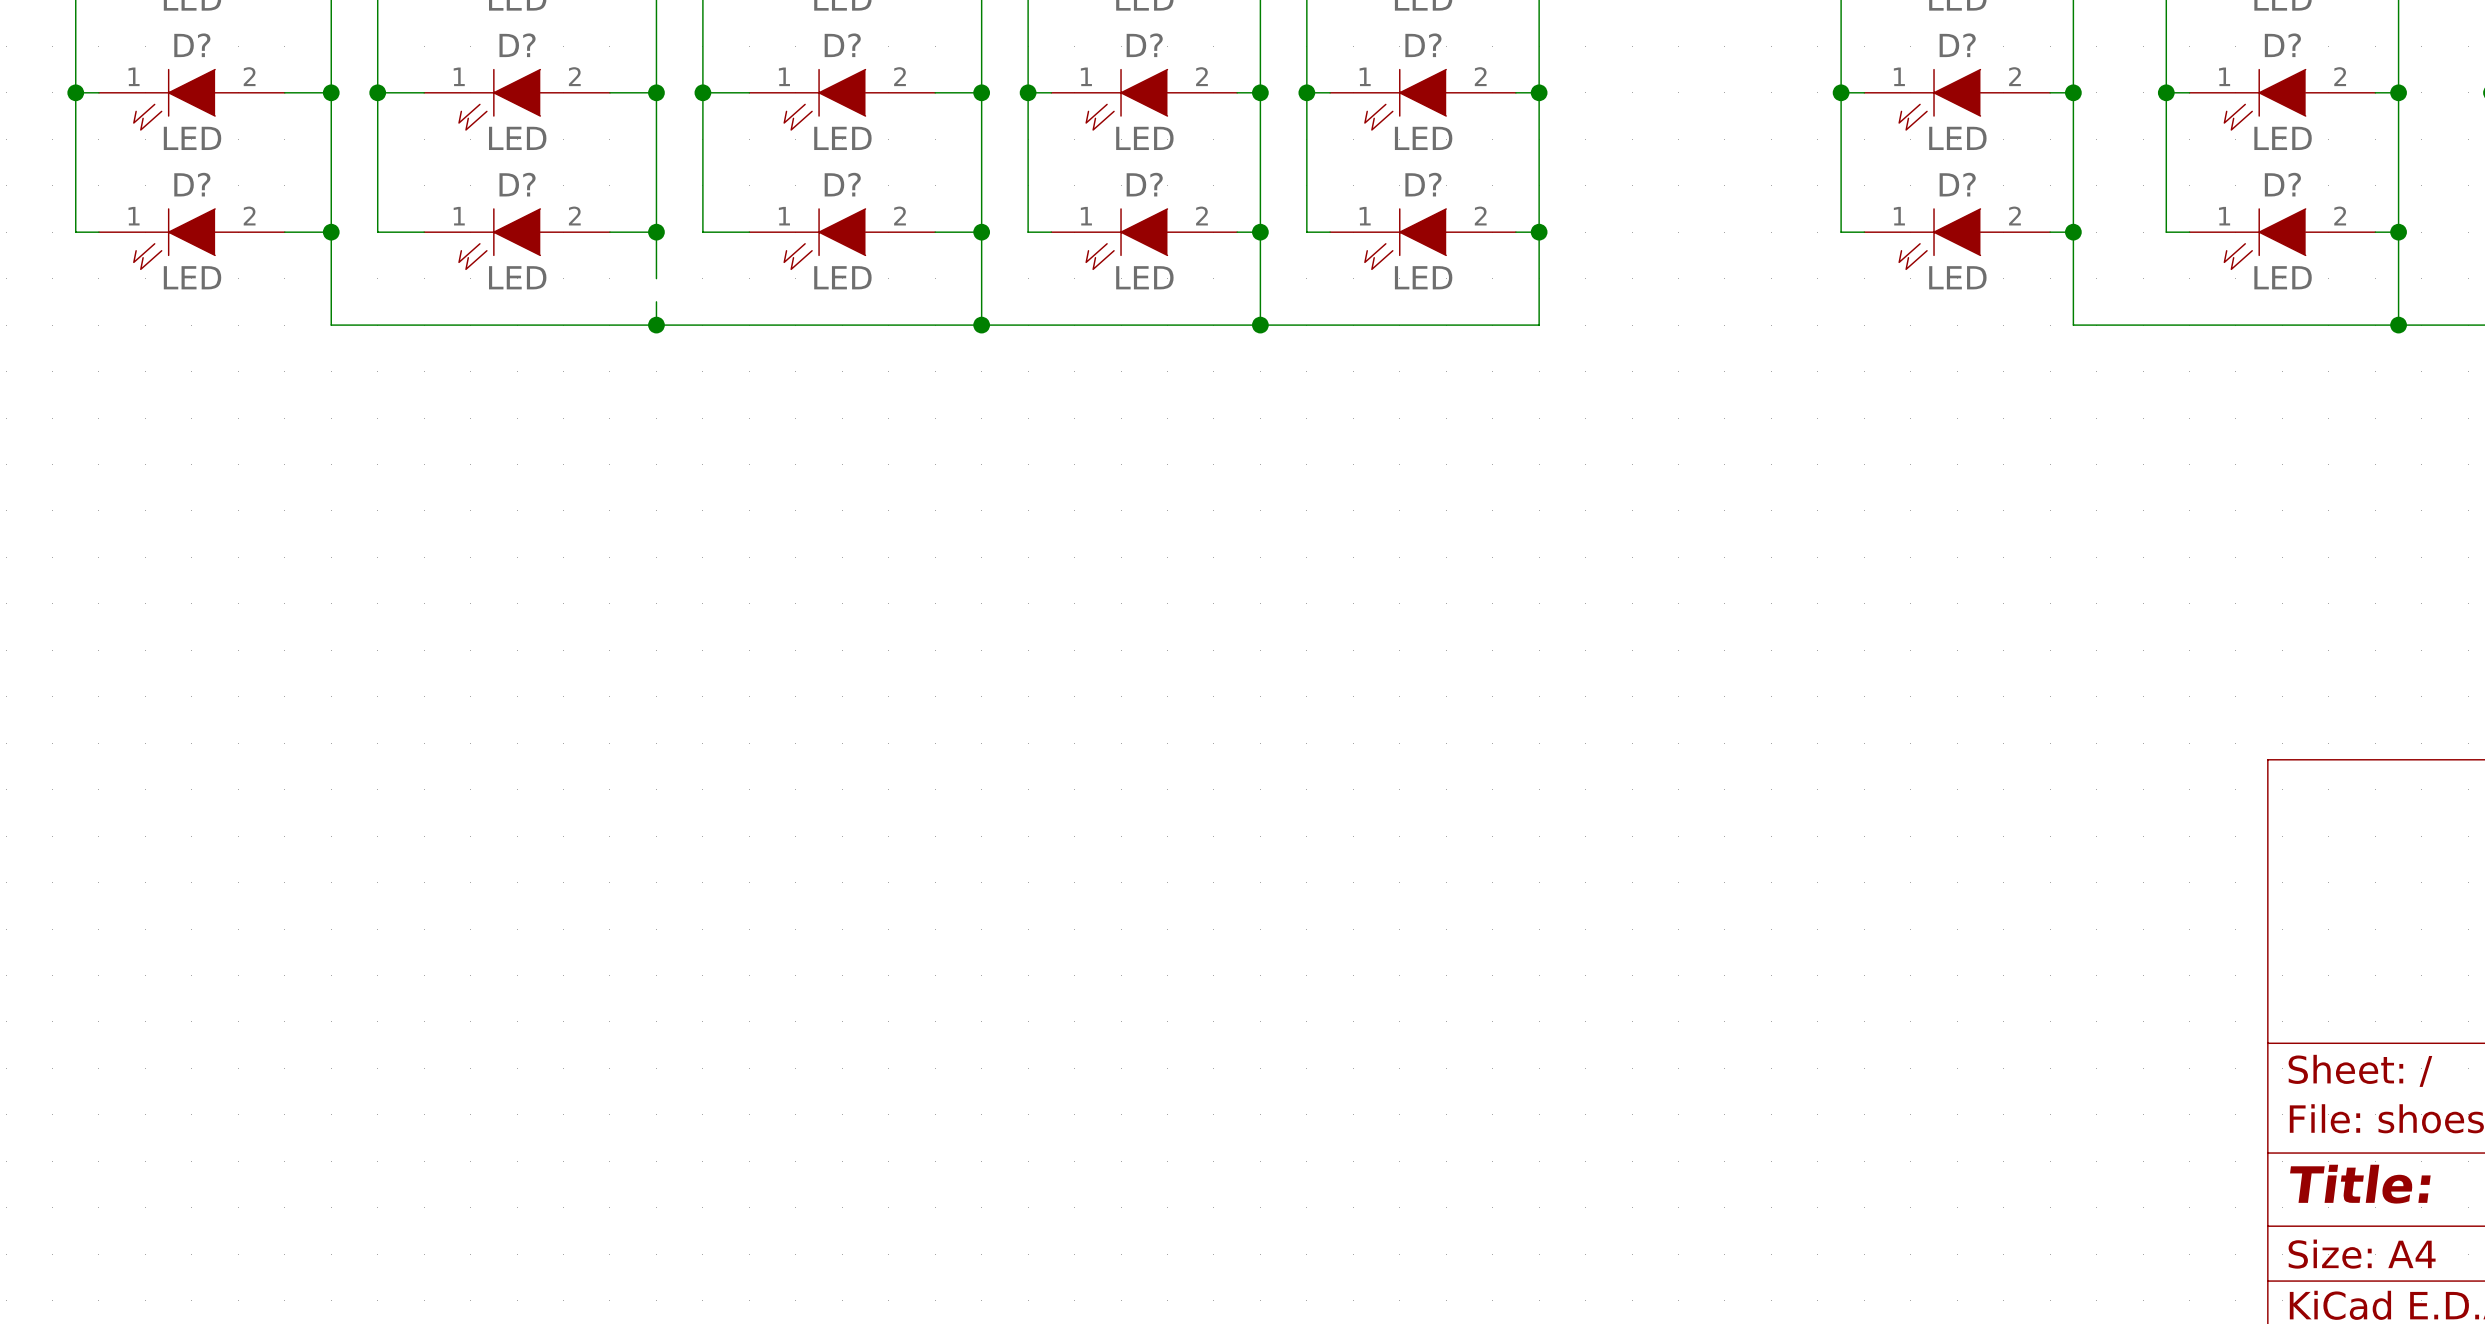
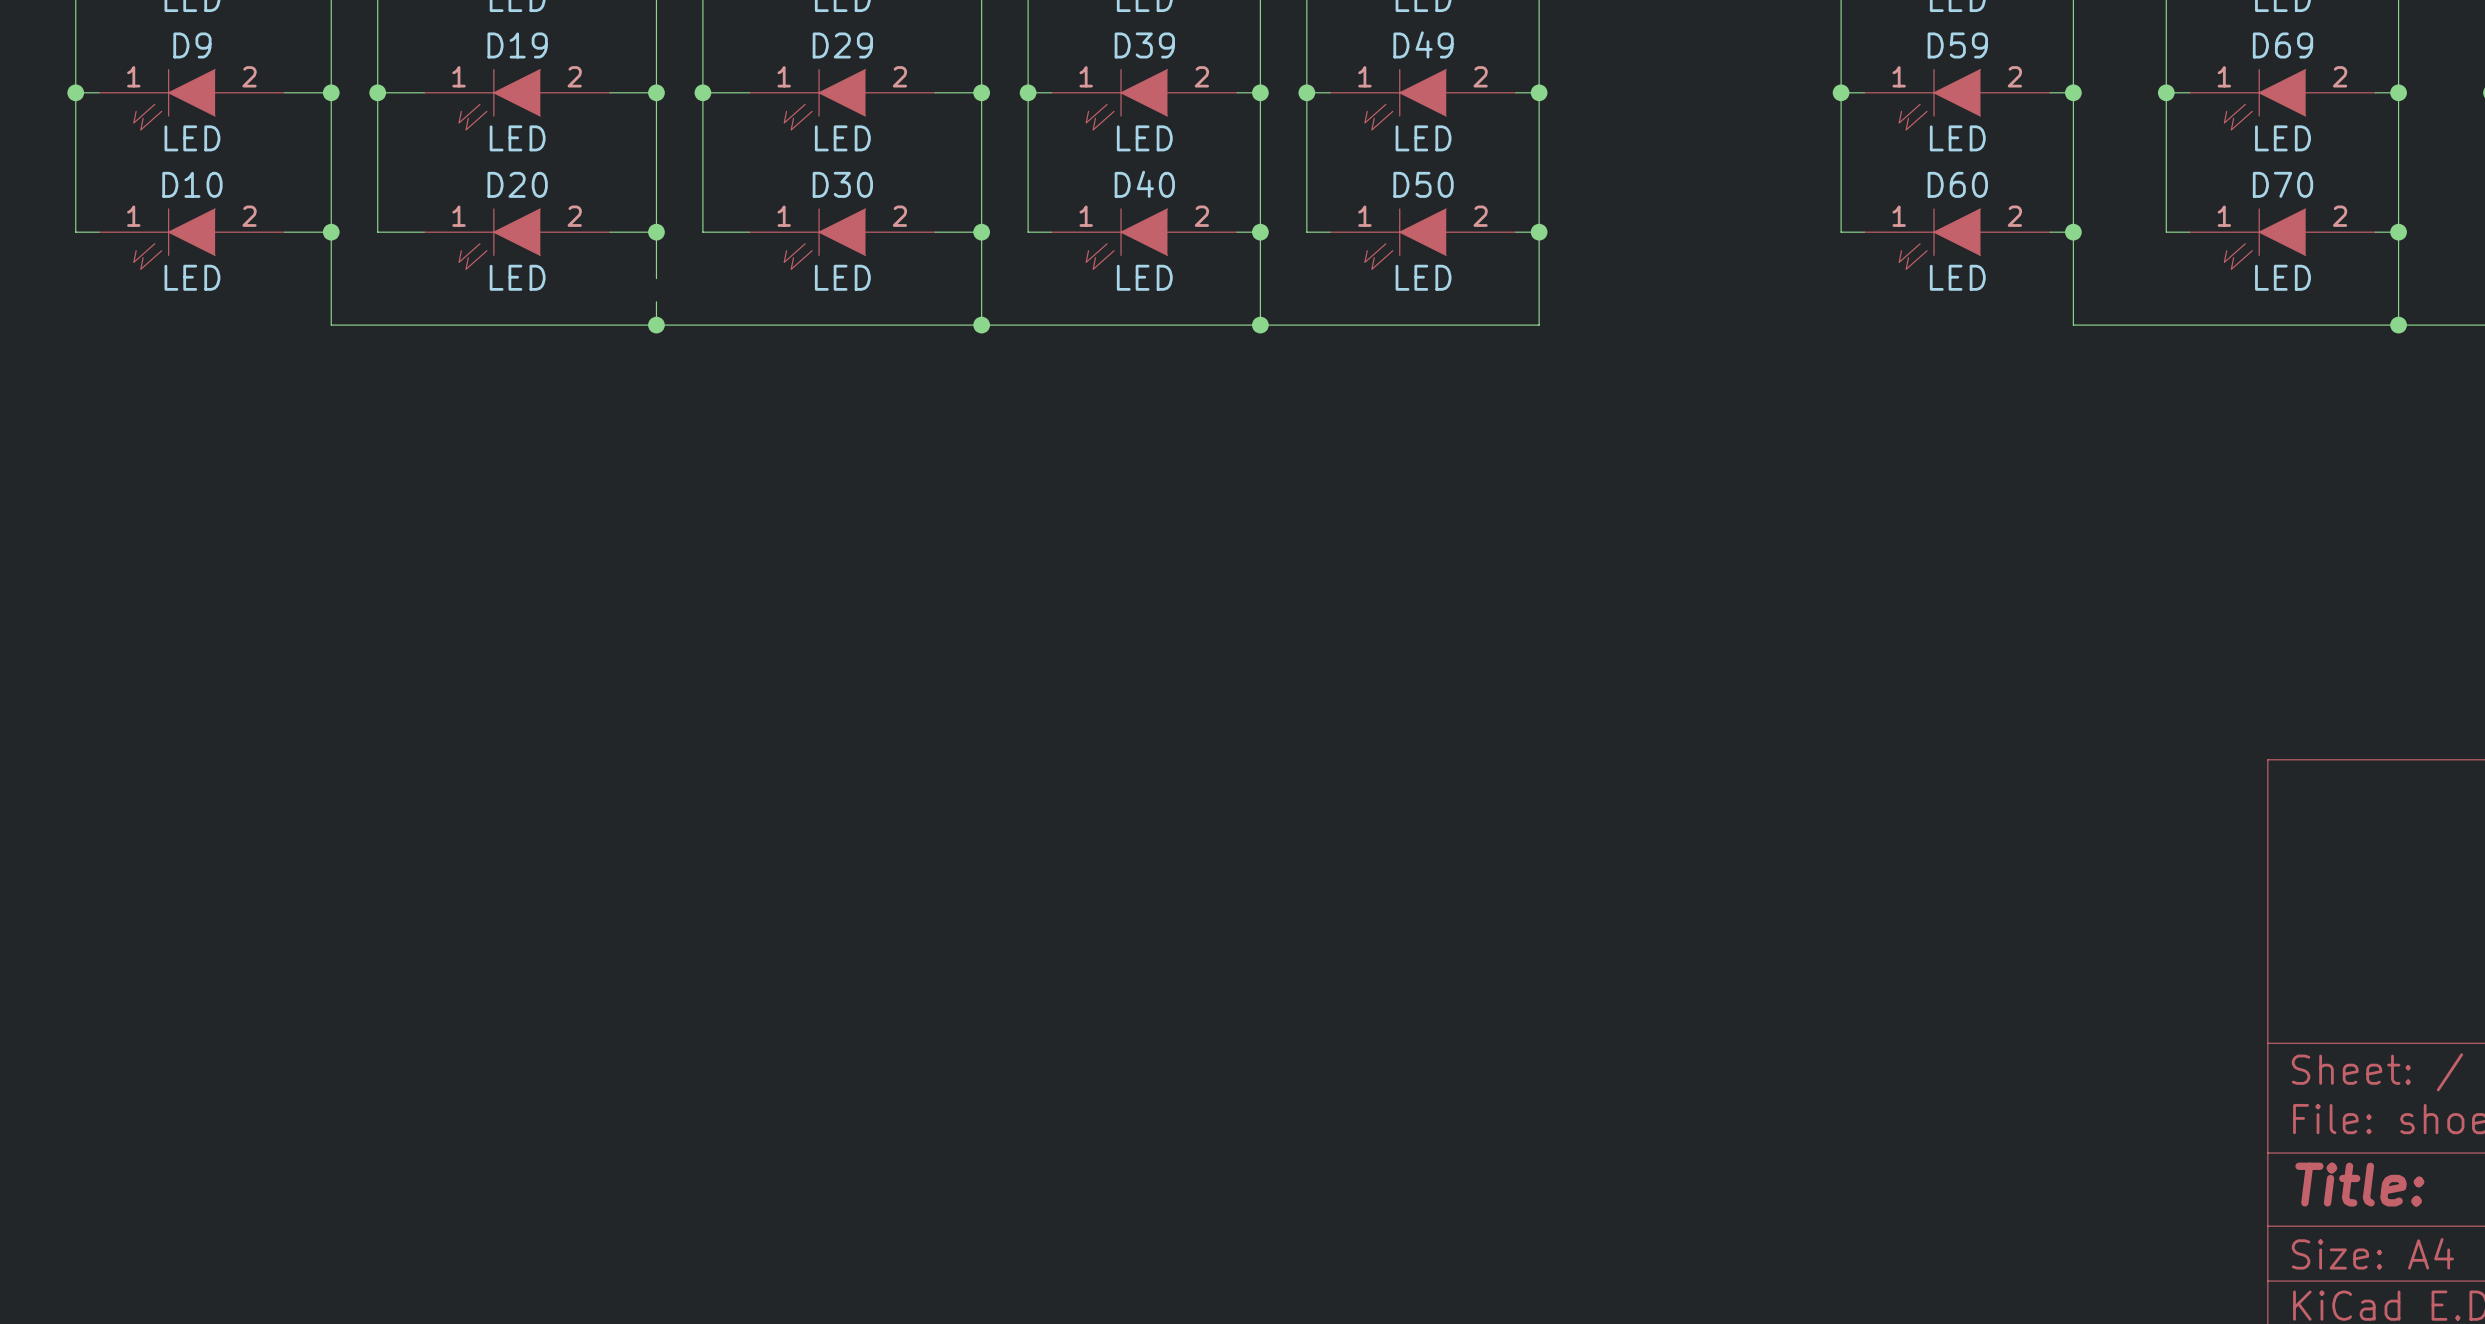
D? name: D? (192, 45) -> D9 (192, 45)
D? name: D? (517, 45) -> D19 (517, 45)
D? name: D? (842, 45) -> D29 (842, 45)
D? name: D? (1144, 45) -> D39 (1144, 45)
D? name: D? (1423, 45) -> D49 (1423, 44)
D? name: D? (1957, 45) -> D59 (1957, 45)
D? name: D? (2282, 45) -> D69 (2282, 45)
D? name: D? (192, 184) -> D10 (192, 184)
D? name: D? (517, 184) -> D20 (517, 184)
D? name: D? (842, 184) -> D30 (842, 184)
D? name: D? (1144, 184) -> D40 (1144, 184)
D? name: D? (1423, 184) -> D50 (1423, 184)
D? name: D? (1957, 184) -> D60 (1957, 184)
D? name: D? (2282, 184) -> D70 (2282, 184)

